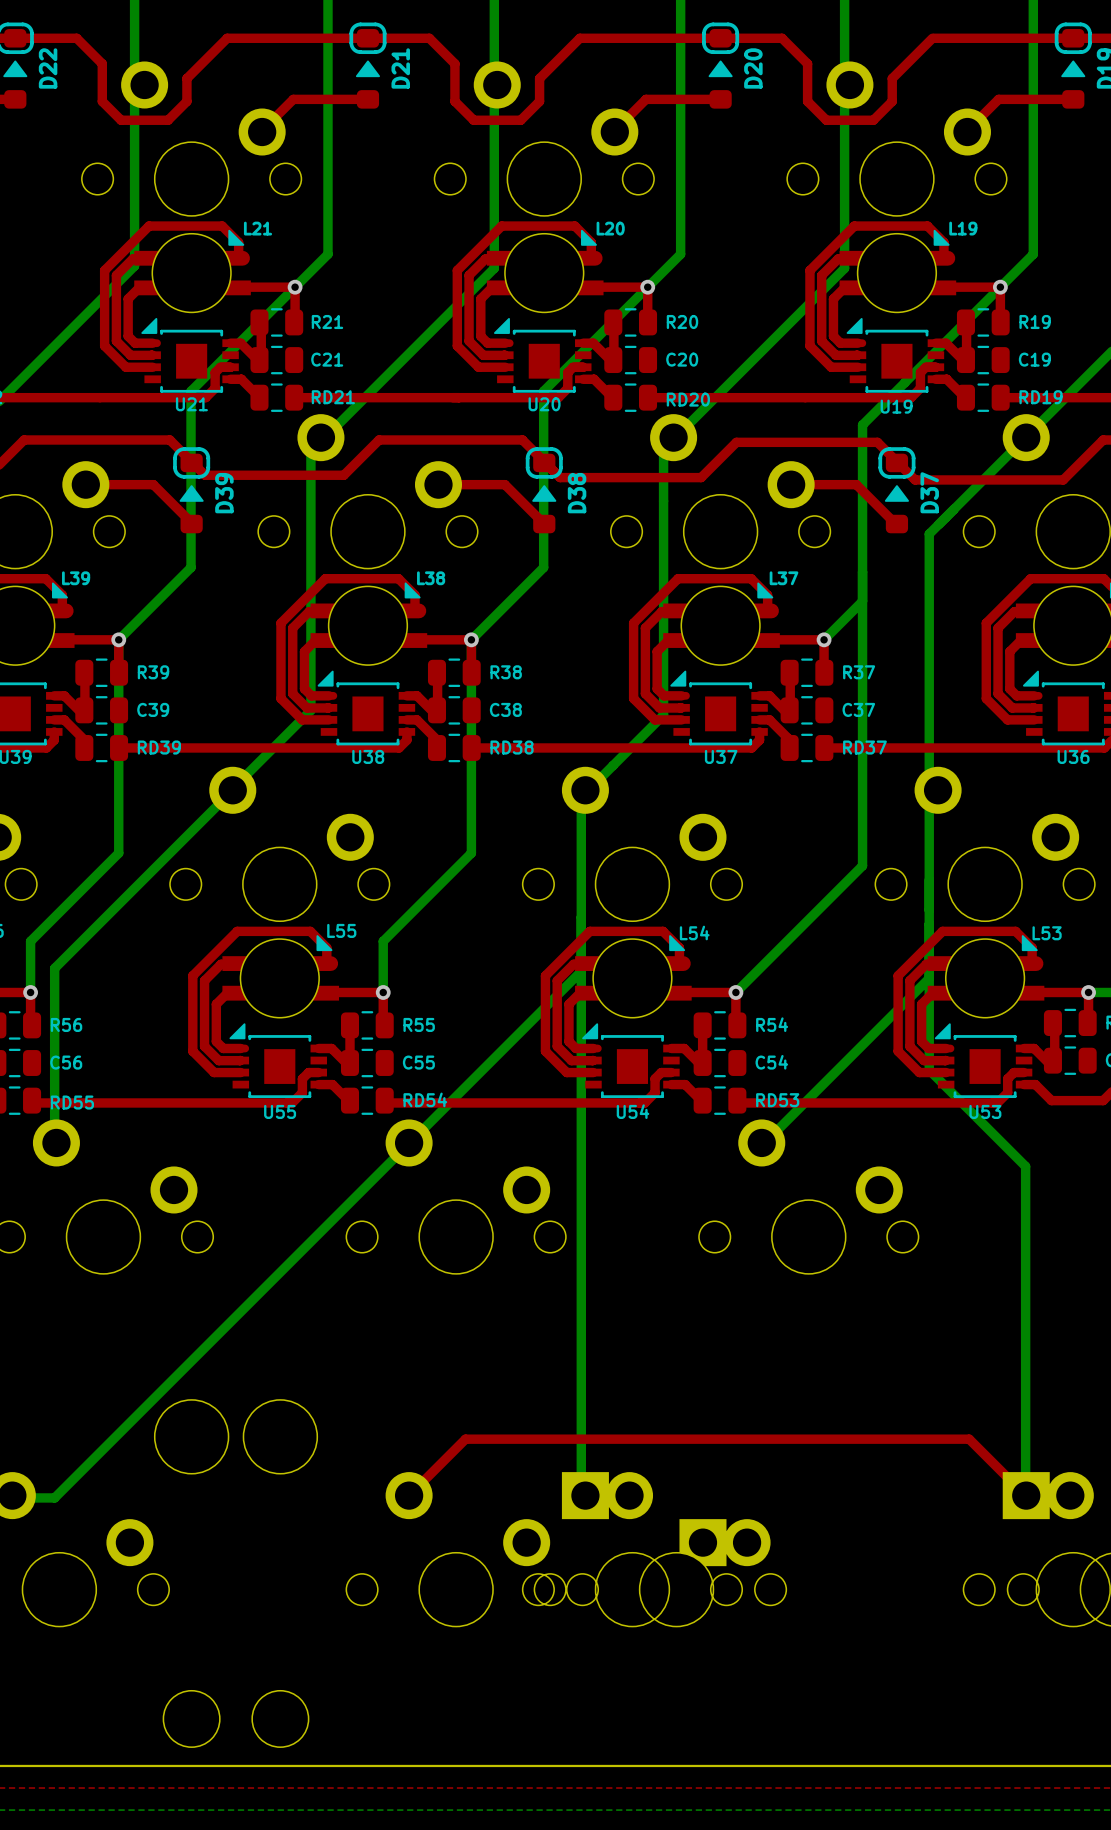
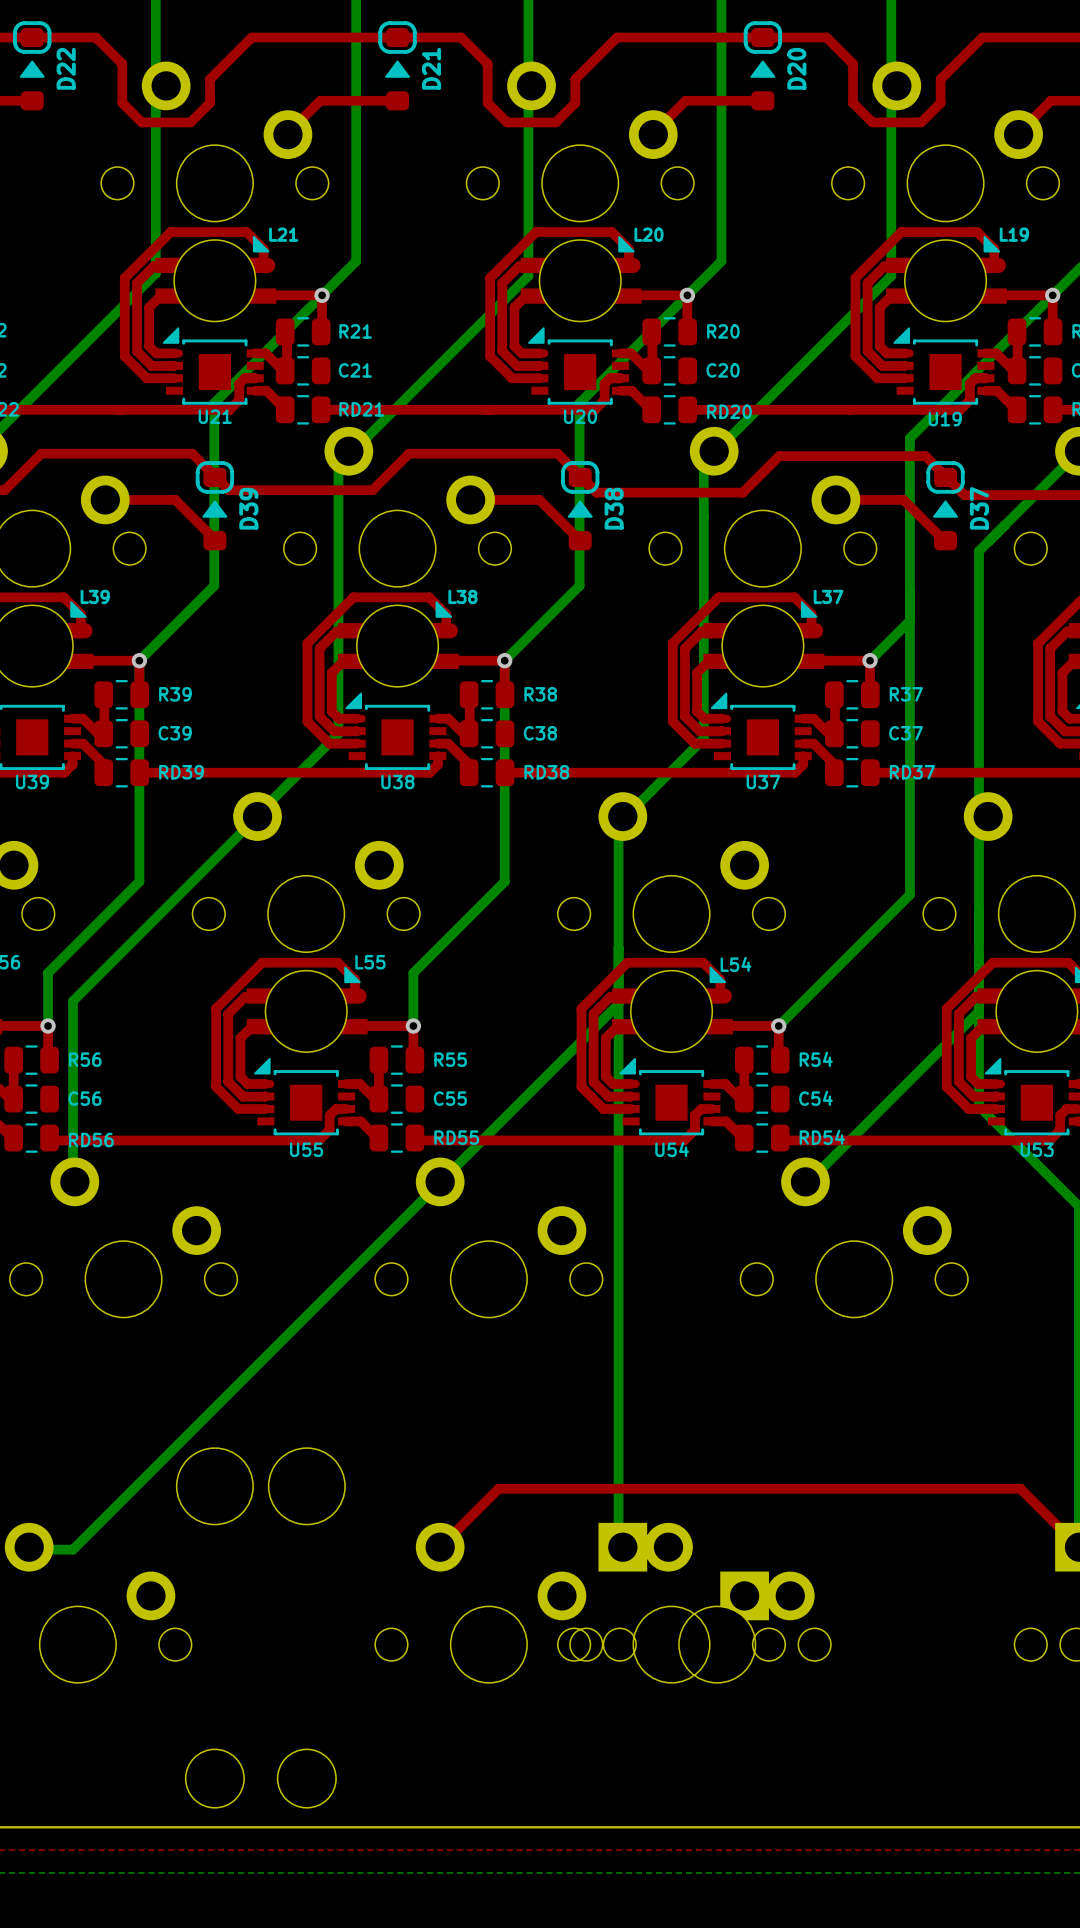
RD54 name: RD54 (425, 1099) -> RD55 (456, 1137)
RD53 name: RD53 (777, 1100) -> RD54 (822, 1137)
RD55 name: RD55 (72, 1102) -> RD56 (91, 1140)

